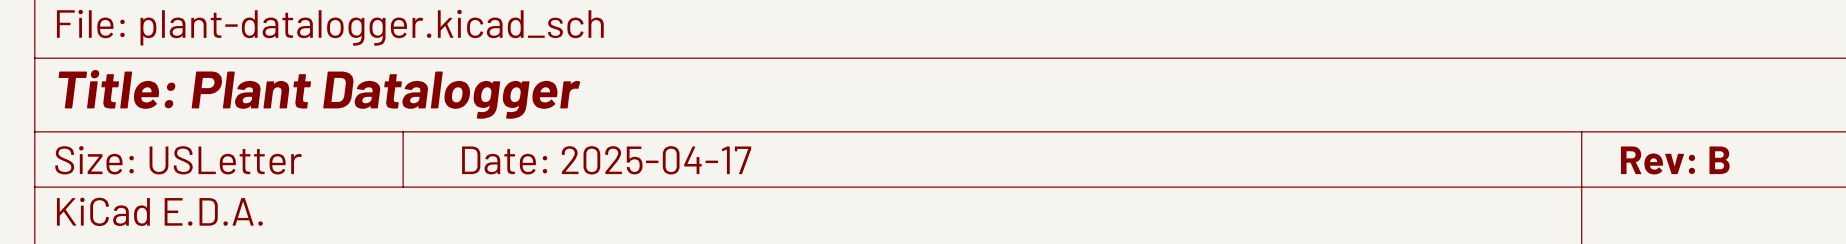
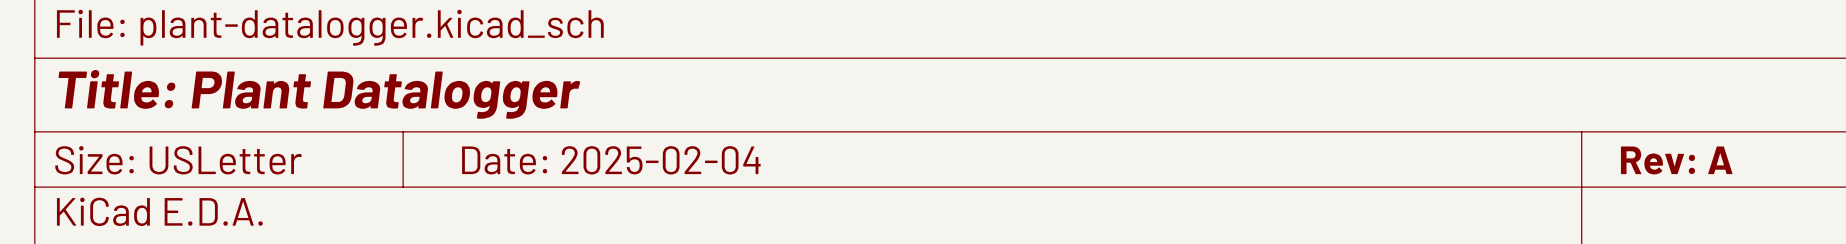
title block: Date: 2025-04-17 (606, 160) -> Date: 2025-02-04 (611, 160)
title block: Rev: B (1675, 160) -> Rev: A (1676, 160)

